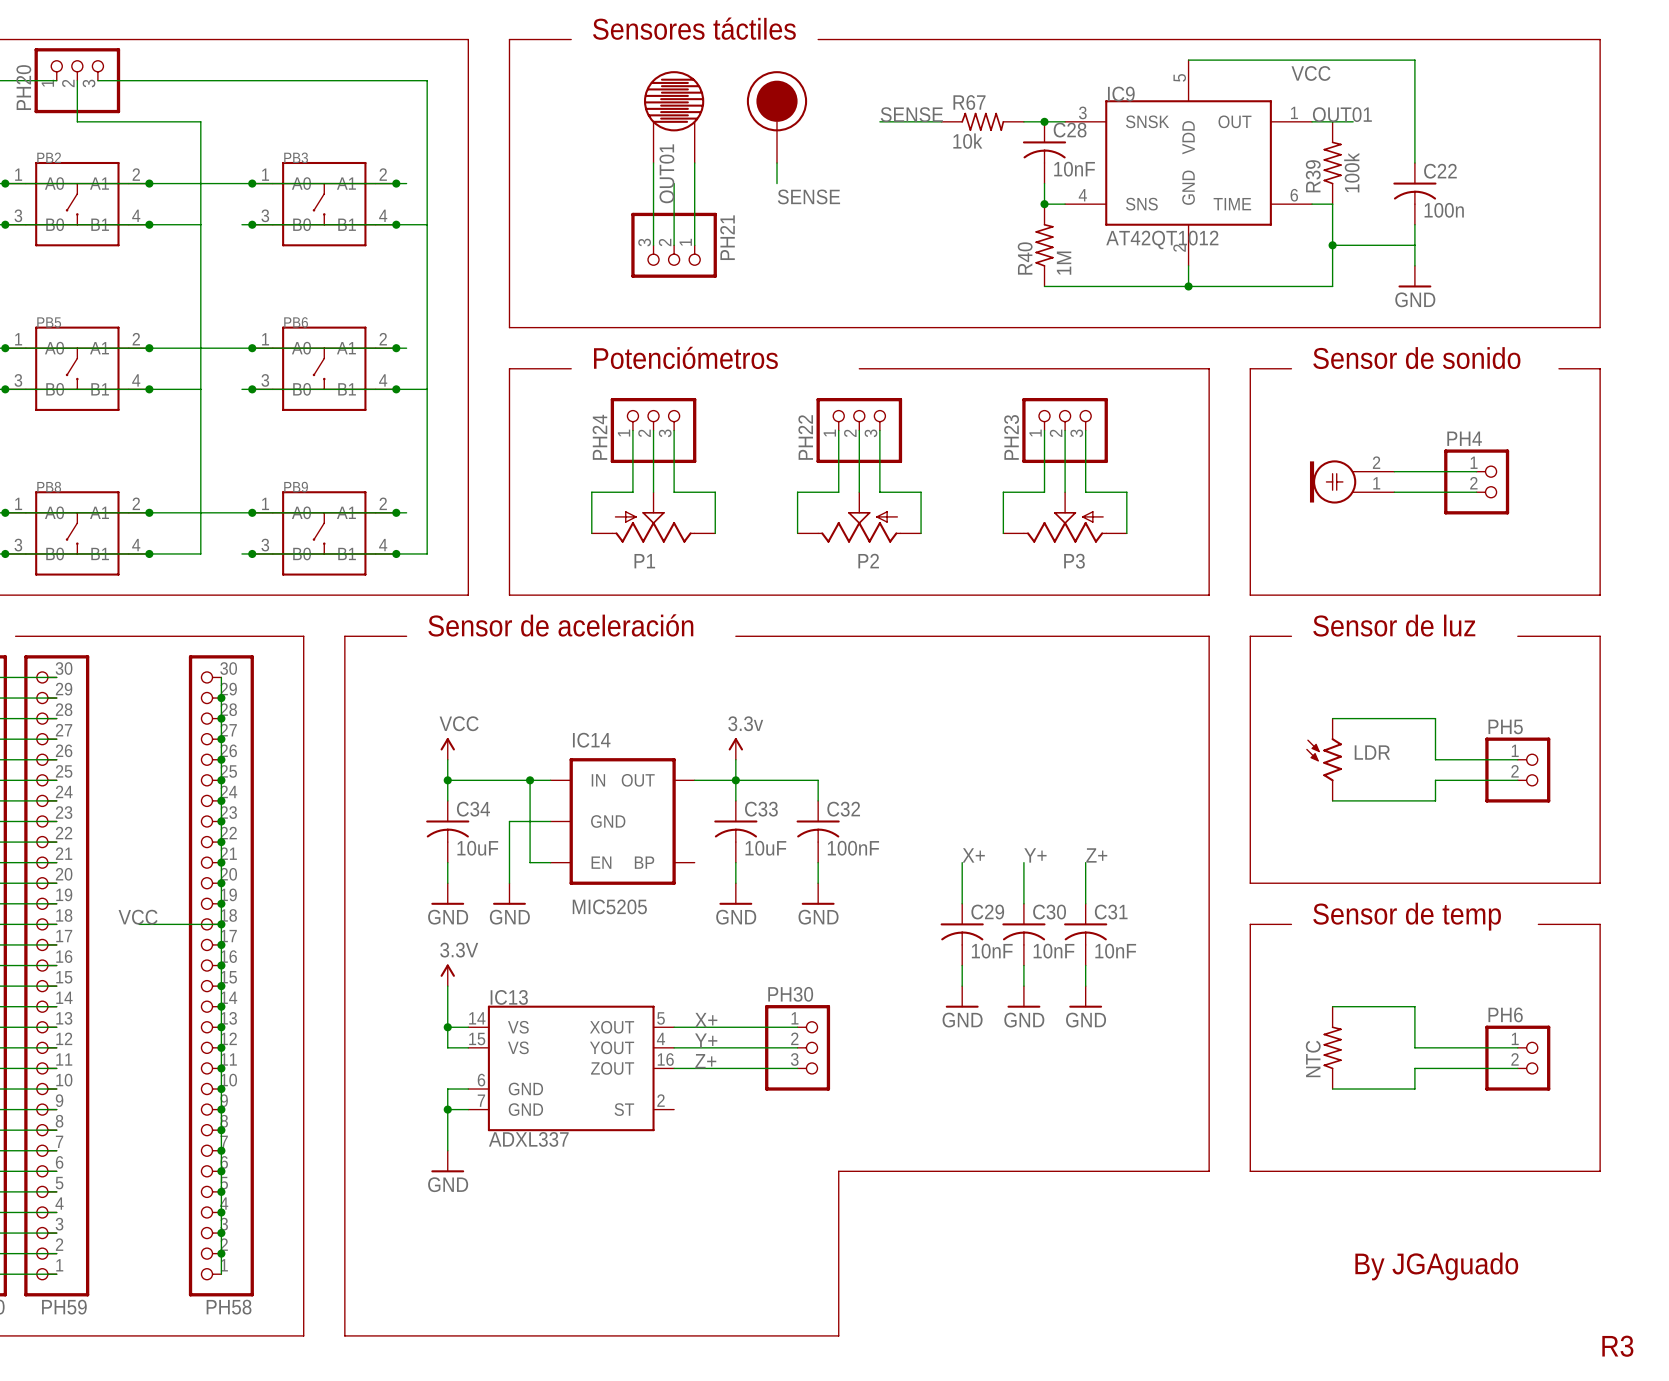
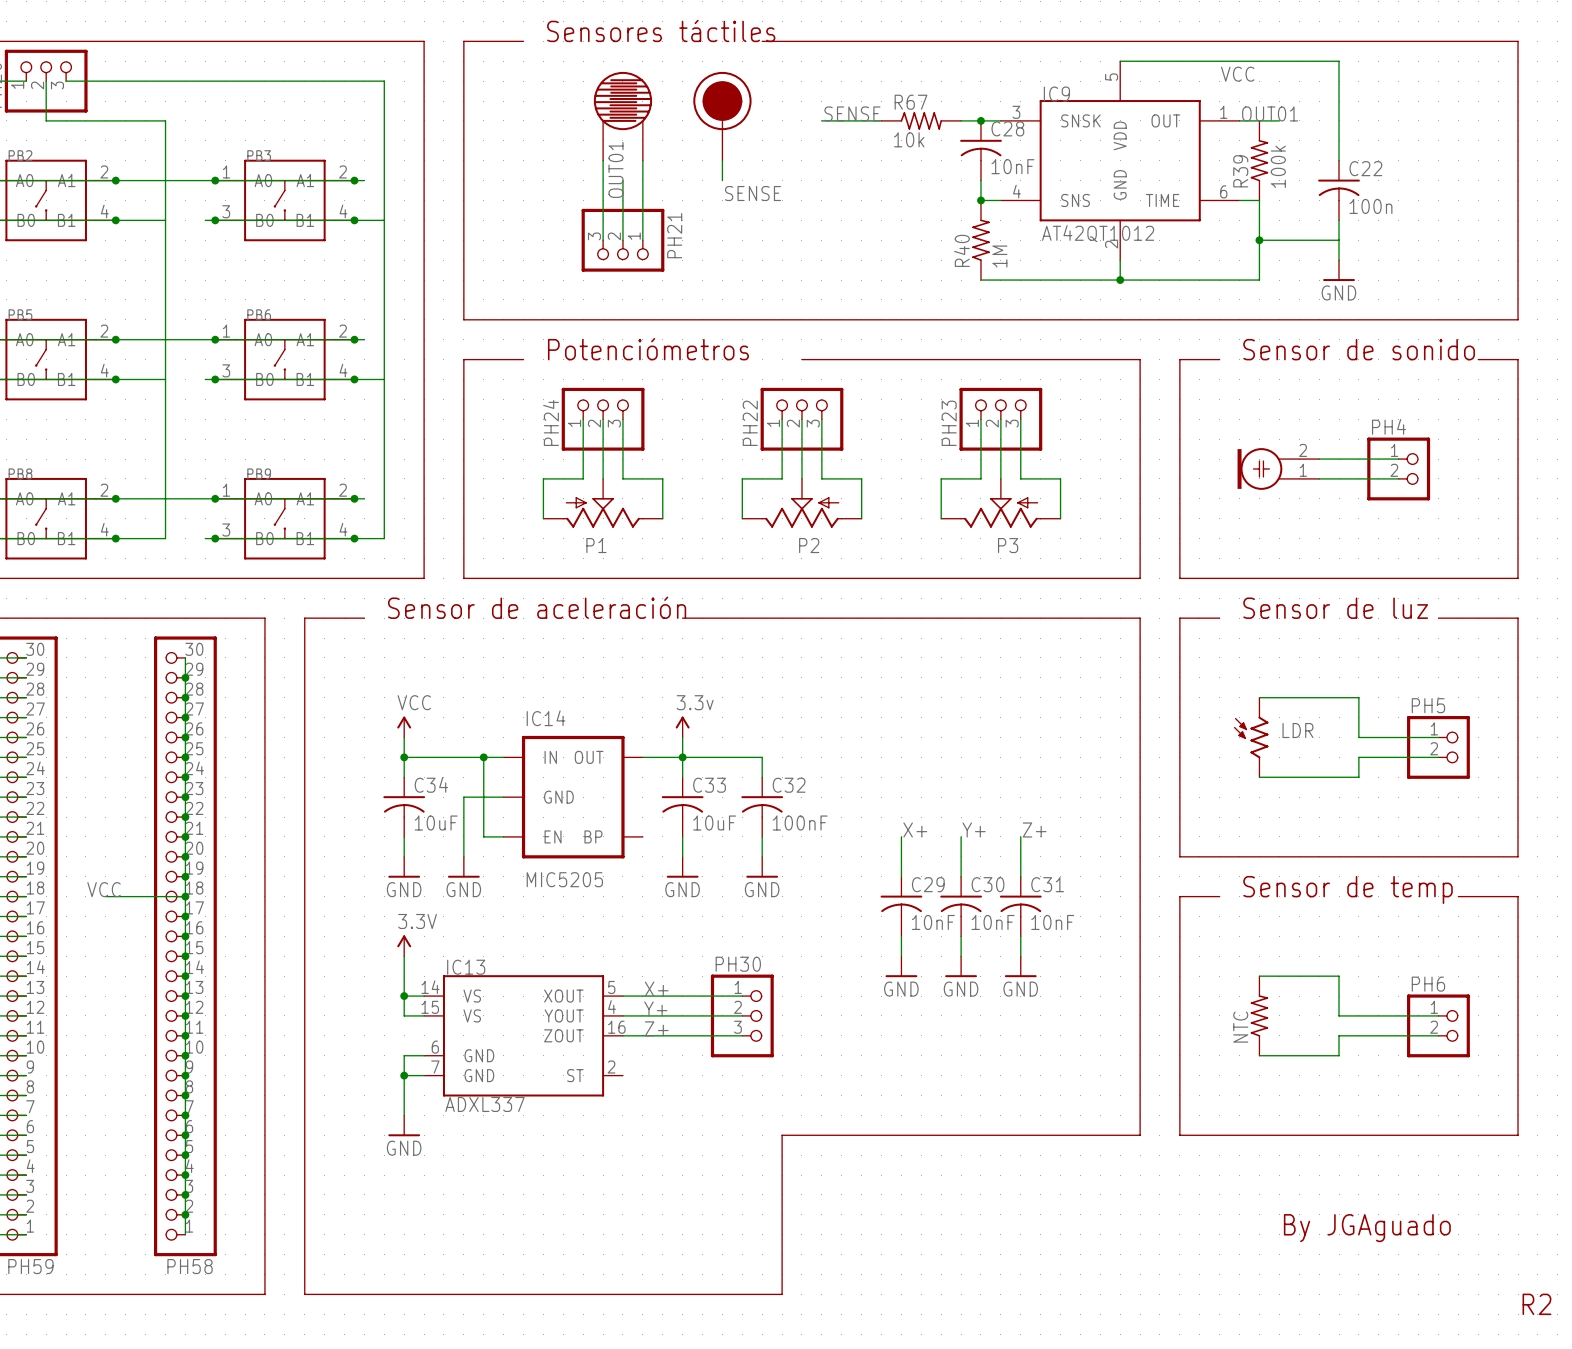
text: R3 (1617, 1346) -> R2 (1536, 1304)

